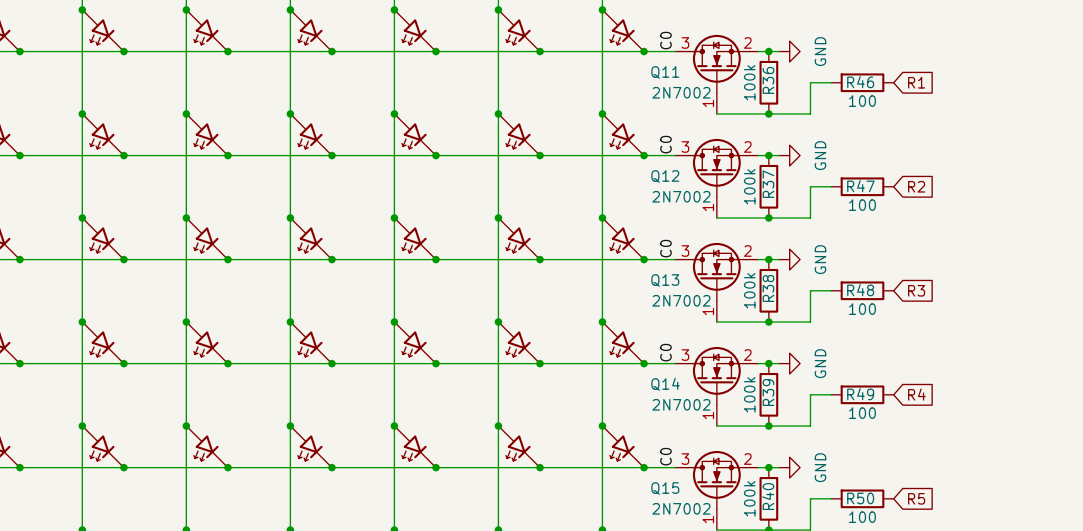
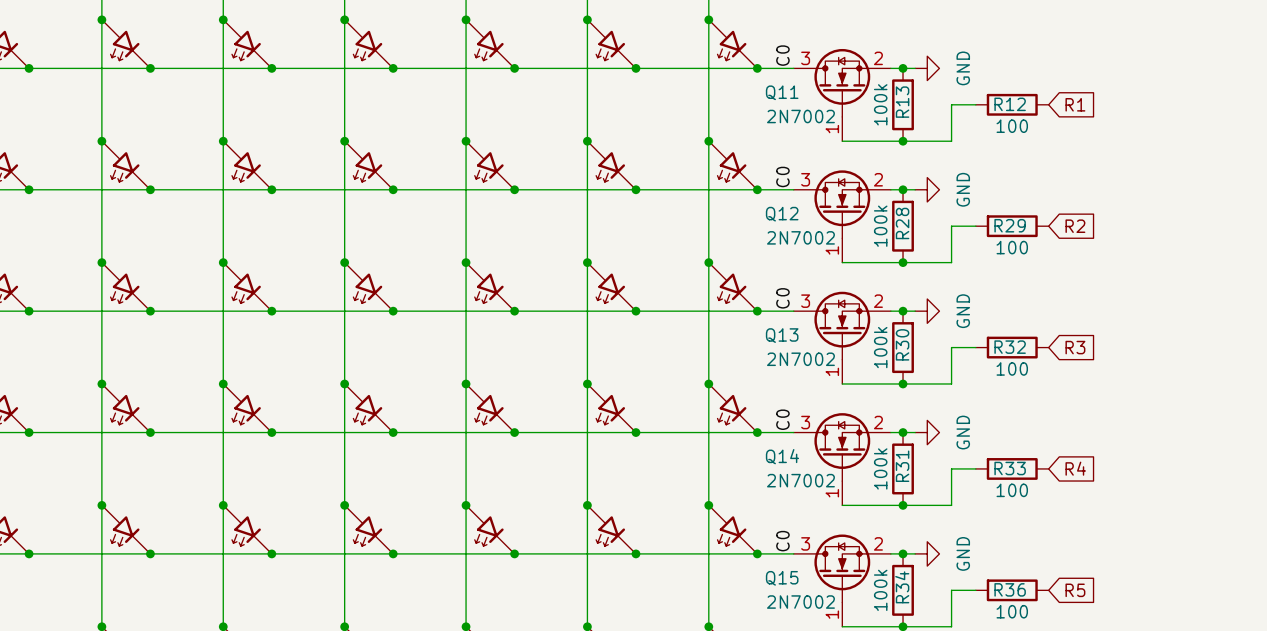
R36 name: R36 (768, 80) -> R13 (902, 102)
R46 name: R46 (860, 82) -> R12 (1010, 104)
R37 name: R37 (768, 184) -> R28 (902, 223)
R47 name: R47 (860, 186) -> R29 (1010, 225)
R38 name: R38 (768, 288) -> R30 (902, 344)
R48 name: R48 (860, 290) -> R32 (1010, 347)
R39 name: R39 (768, 392) -> R31 (902, 466)
R49 name: R49 (860, 394) -> R33 (1010, 468)
R40 name: R40 (768, 496) -> R34 (902, 587)
R50 name: R50 (860, 498) -> R36 (1010, 589)

